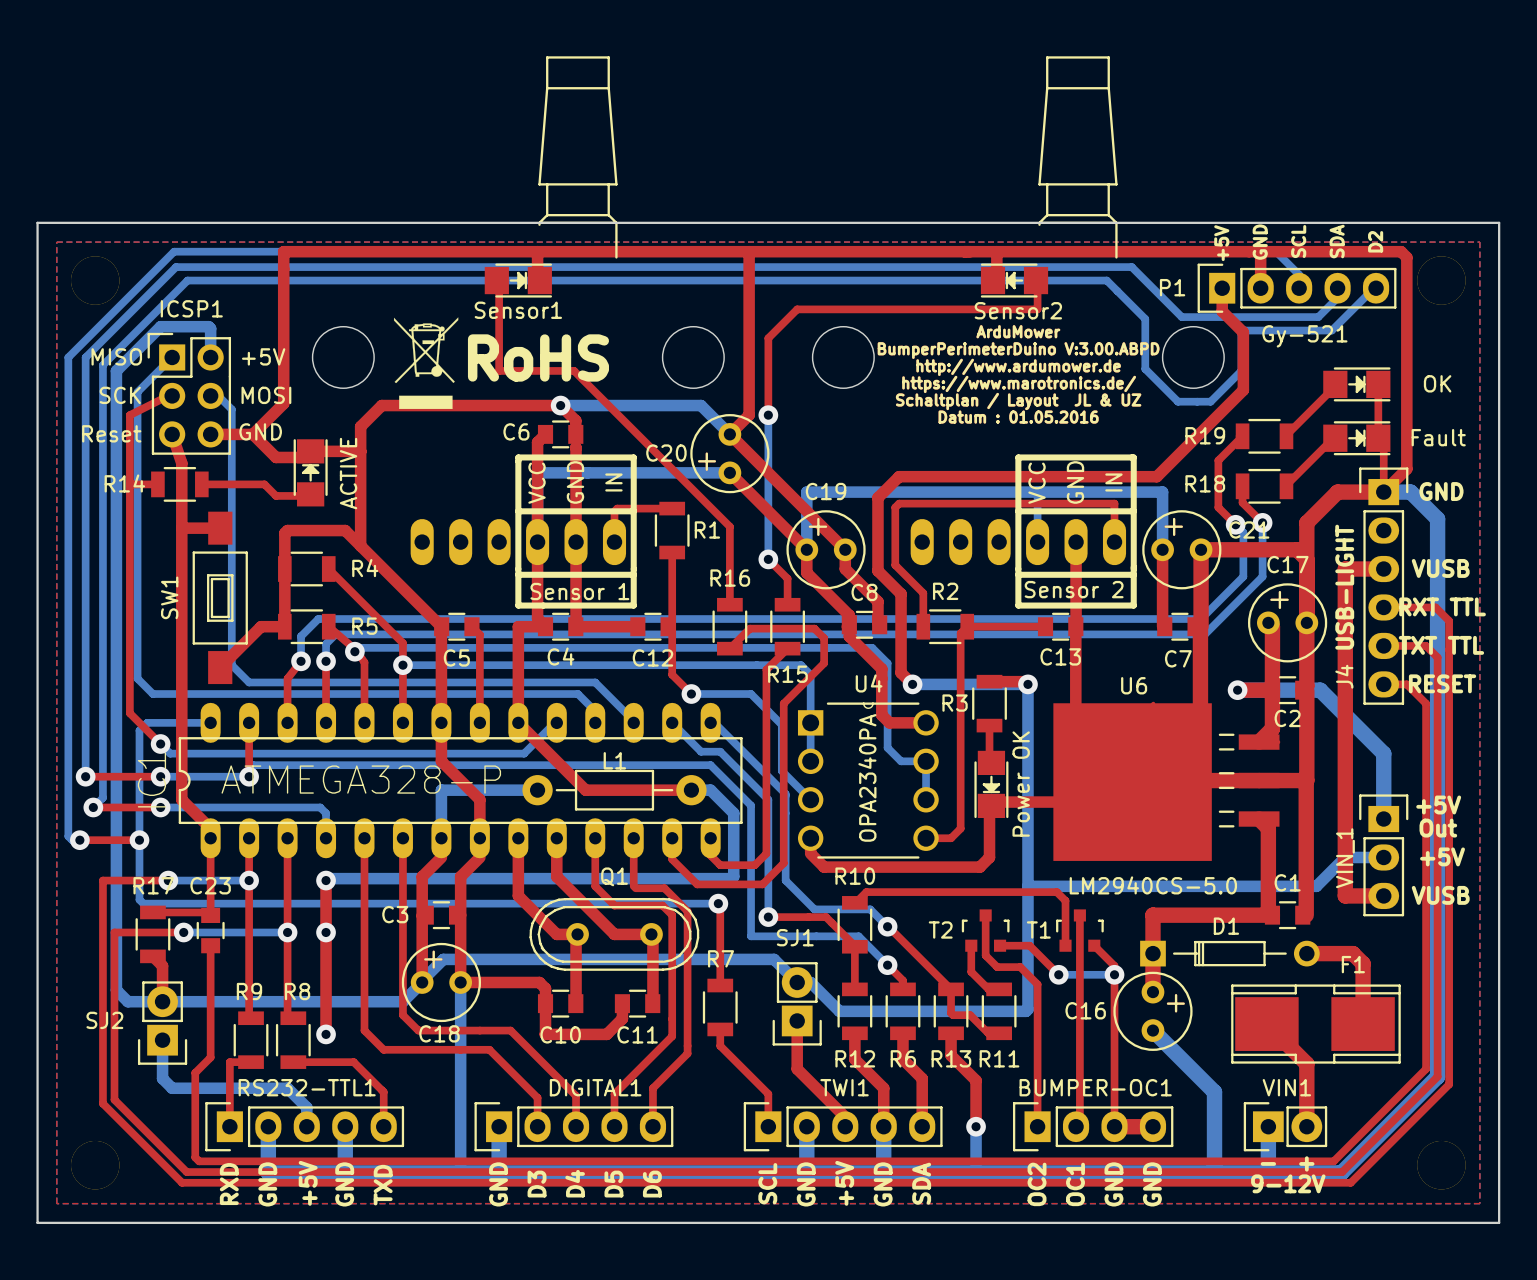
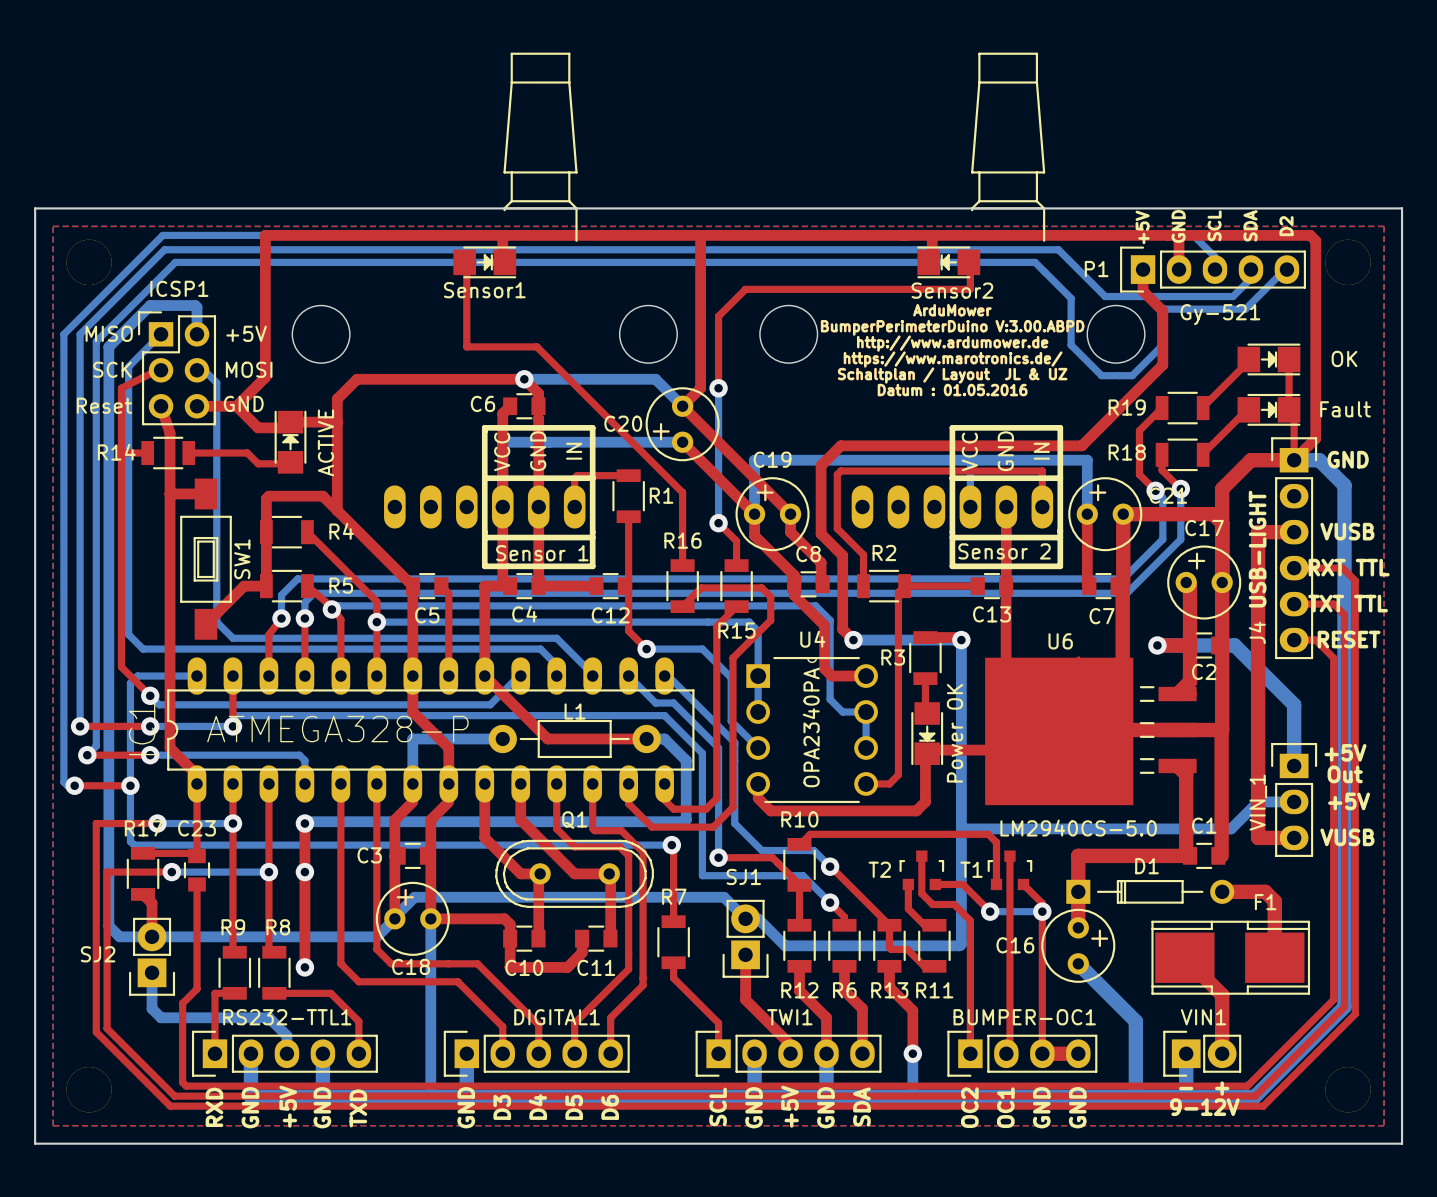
drawing: [393, 317, 459, 410] -> none
text: RoHS (538, 357) -> none
SW1 name position: SW1 (169, 597) -> SW1 (242, 559)

